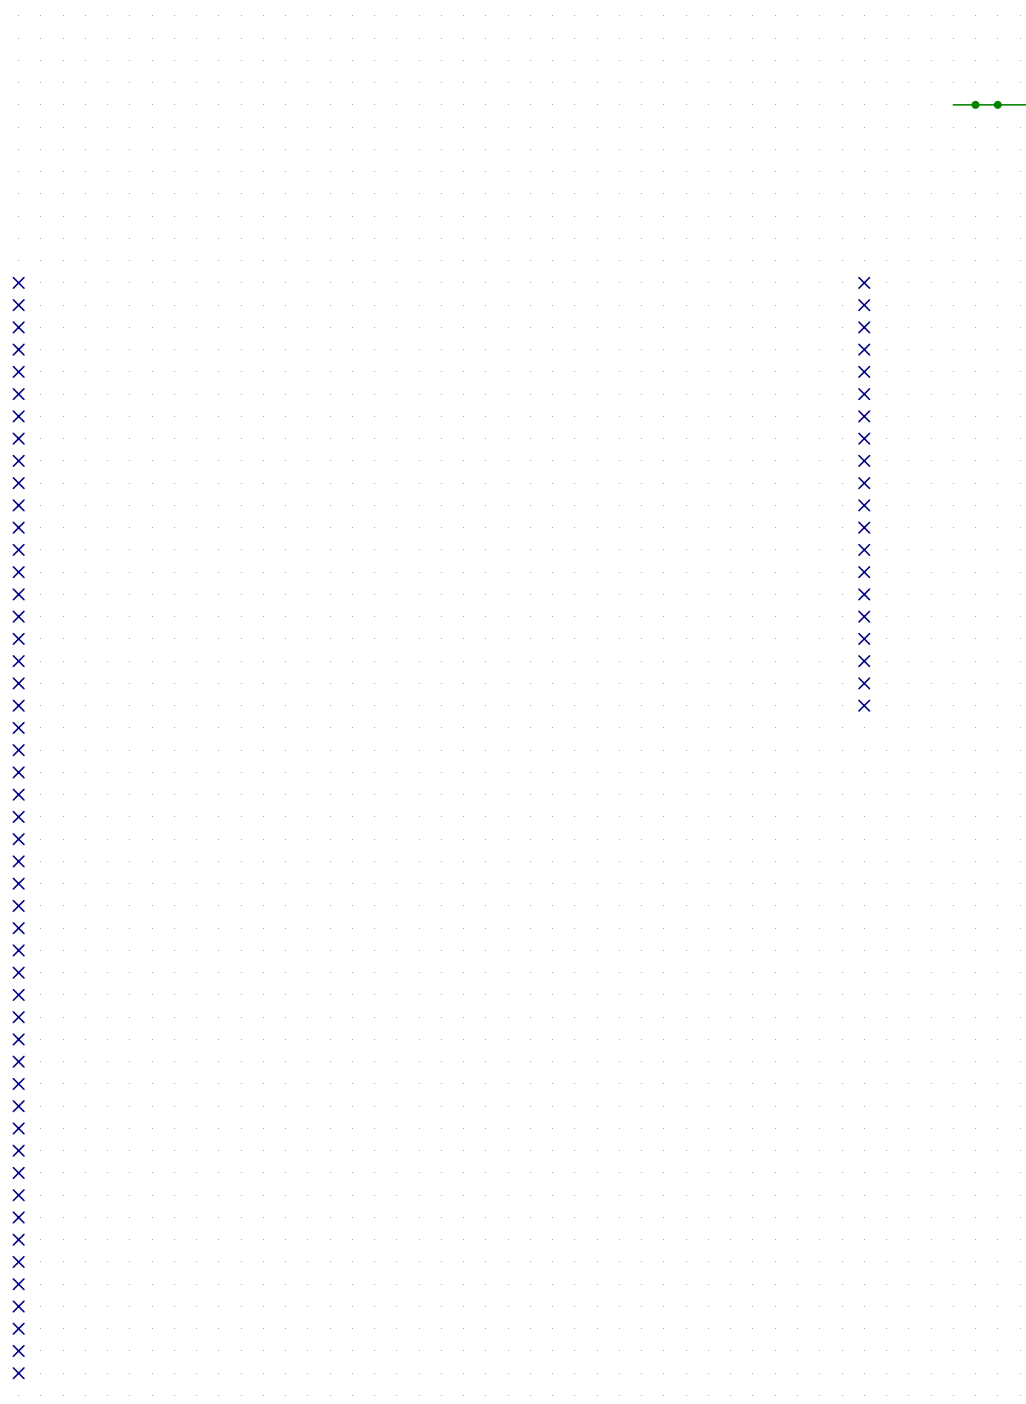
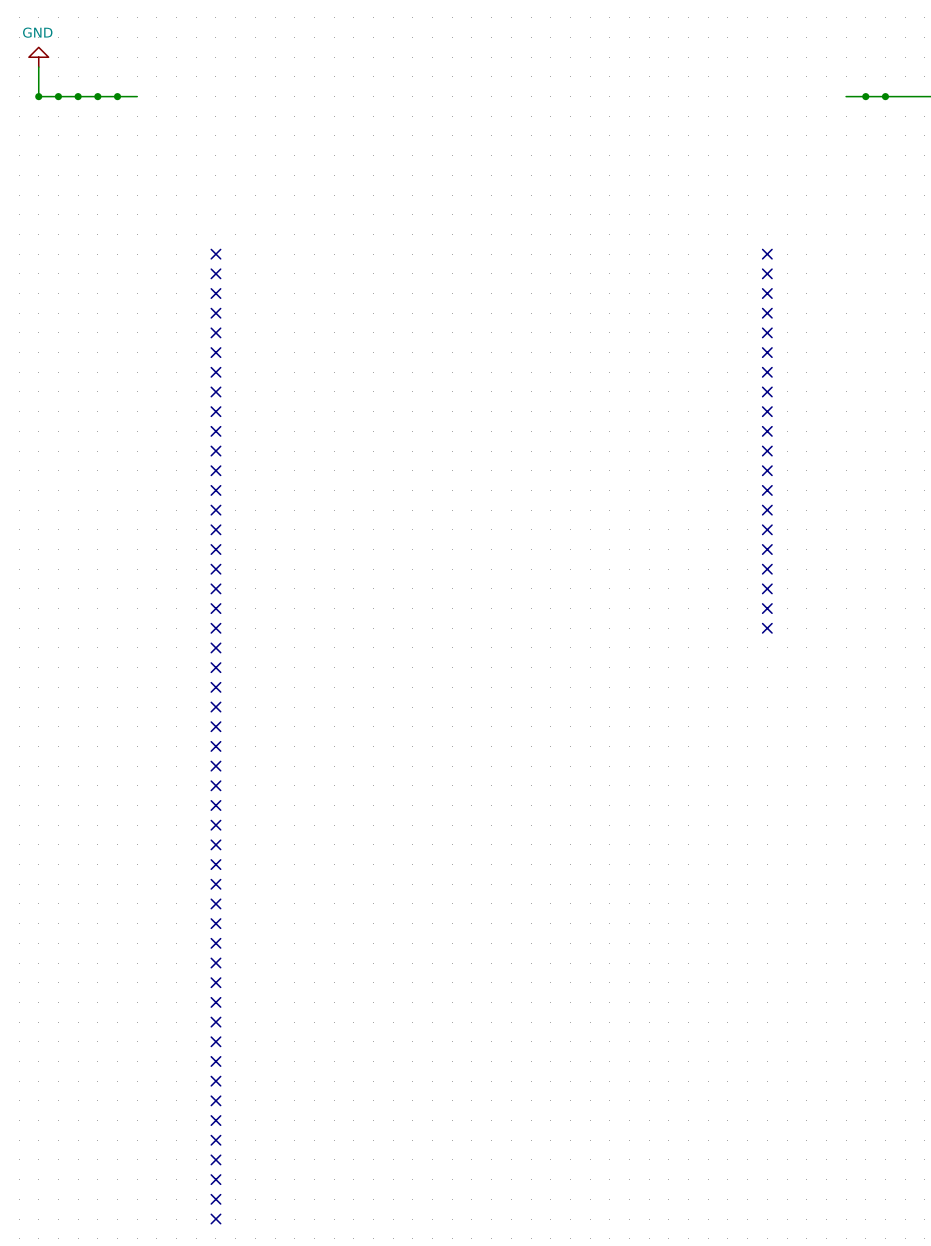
power symbol: none -> GND (38, 57)
wire: none -> (38, 67) (38, 96) (137, 96)
junction: none -> (38, 96)
junction: none -> (58, 96)
junction: none -> (78, 96)
junction: none -> (97, 96)
junction: none -> (117, 96)
no-connect mark: (18, 282) -> none
no-connect mark: none -> (215, 254)
no-connect mark: (18, 305) -> none
no-connect mark: none -> (215, 273)
no-connect mark: (18, 327) -> none
no-connect mark: none -> (215, 293)
no-connect mark: (18, 349) -> none
no-connect mark: none -> (215, 313)
no-connect mark: (18, 371) -> none
no-connect mark: none -> (215, 332)
no-connect mark: (18, 394) -> none
no-connect mark: none -> (215, 352)
no-connect mark: (18, 416) -> none
no-connect mark: none -> (215, 372)
no-connect mark: (18, 438) -> none
no-connect mark: none -> (215, 391)
no-connect mark: (18, 460) -> none
no-connect mark: none -> (215, 411)
no-connect mark: (18, 483) -> none
no-connect mark: none -> (215, 431)
no-connect mark: (18, 505) -> none
no-connect mark: none -> (215, 451)
no-connect mark: (18, 527) -> none
no-connect mark: none -> (215, 470)
no-connect mark: (18, 549) -> none
no-connect mark: none -> (215, 490)
no-connect mark: (18, 572) -> none
no-connect mark: none -> (215, 510)
no-connect mark: (18, 594) -> none
no-connect mark: none -> (215, 529)
no-connect mark: (18, 616) -> none
no-connect mark: none -> (215, 549)
no-connect mark: (18, 638) -> none
no-connect mark: none -> (215, 569)
no-connect mark: (18, 661) -> none
no-connect mark: none -> (215, 588)
no-connect mark: (18, 683) -> none
no-connect mark: none -> (215, 608)
no-connect mark: (18, 705) -> none
no-connect mark: none -> (215, 628)
no-connect mark: (18, 727) -> none
no-connect mark: none -> (215, 647)
no-connect mark: (18, 750) -> none
no-connect mark: none -> (215, 667)
no-connect mark: (18, 772) -> none
no-connect mark: none -> (215, 687)
no-connect mark: (18, 794) -> none
no-connect mark: none -> (215, 707)
no-connect mark: (18, 816) -> none
no-connect mark: none -> (215, 726)
no-connect mark: (18, 839) -> none
no-connect mark: none -> (215, 746)
no-connect mark: (18, 861) -> none
no-connect mark: none -> (215, 766)
no-connect mark: (18, 883) -> none
no-connect mark: none -> (215, 785)
no-connect mark: (18, 905) -> none
no-connect mark: none -> (215, 805)
no-connect mark: (18, 928) -> none
no-connect mark: none -> (215, 825)
no-connect mark: (18, 950) -> none
no-connect mark: none -> (215, 844)
no-connect mark: (18, 972) -> none
no-connect mark: none -> (215, 864)
no-connect mark: (18, 994) -> none
no-connect mark: none -> (215, 884)
no-connect mark: (18, 1017) -> none
no-connect mark: none -> (215, 903)
no-connect mark: (18, 1039) -> none
no-connect mark: none -> (215, 923)
no-connect mark: (18, 1061) -> none
no-connect mark: none -> (215, 943)
no-connect mark: (18, 1083) -> none
no-connect mark: none -> (215, 963)
no-connect mark: (18, 1106) -> none
no-connect mark: none -> (215, 982)
no-connect mark: (18, 1128) -> none
no-connect mark: none -> (215, 1002)
no-connect mark: (18, 1150) -> none
no-connect mark: none -> (215, 1022)
no-connect mark: (18, 1172) -> none
no-connect mark: none -> (215, 1041)
no-connect mark: (18, 1195) -> none
no-connect mark: none -> (215, 1061)
no-connect mark: (18, 1217) -> none
no-connect mark: none -> (215, 1081)
no-connect mark: (18, 1239) -> none
no-connect mark: none -> (215, 1100)
no-connect mark: (18, 1261) -> none
no-connect mark: none -> (215, 1120)
no-connect mark: (18, 1284) -> none
no-connect mark: none -> (215, 1140)
no-connect mark: (18, 1306) -> none
no-connect mark: none -> (215, 1159)
no-connect mark: (18, 1328) -> none
no-connect mark: none -> (215, 1179)
no-connect mark: (18, 1350) -> none
no-connect mark: none -> (215, 1199)
no-connect mark: (18, 1373) -> none
no-connect mark: none -> (215, 1219)

